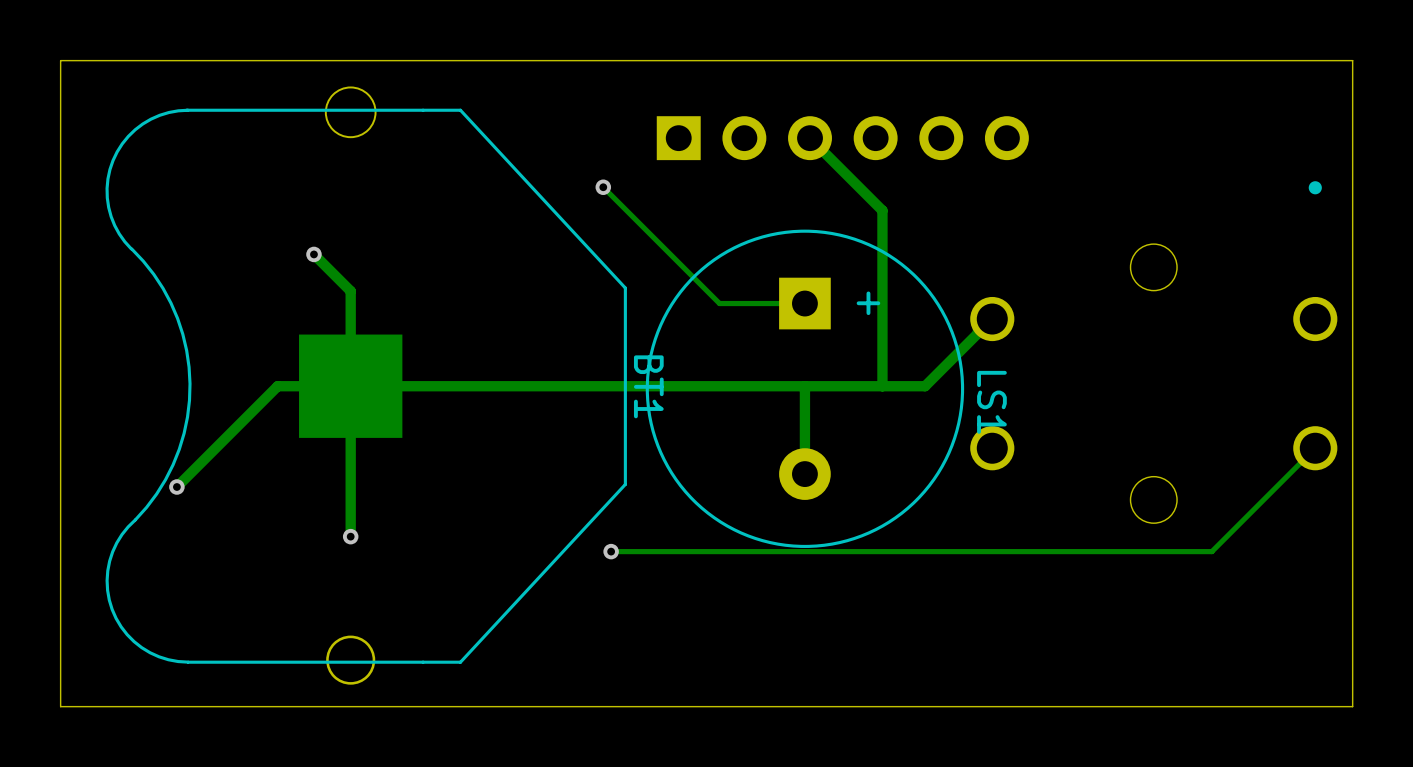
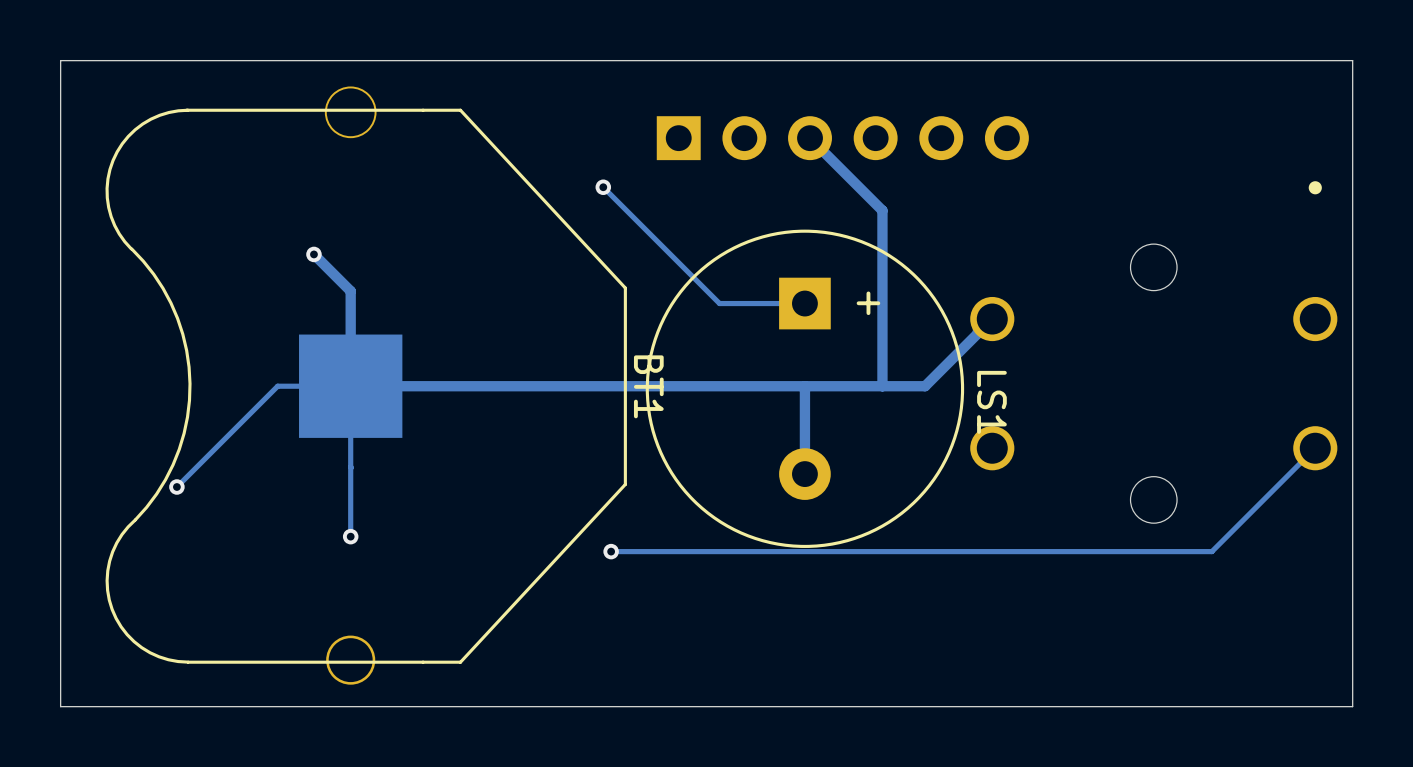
track width: thick (176, 487) (277, 386) (350, 386) (350, 536) -> thin (176, 487) (277, 386) (350, 386) (350, 536)

